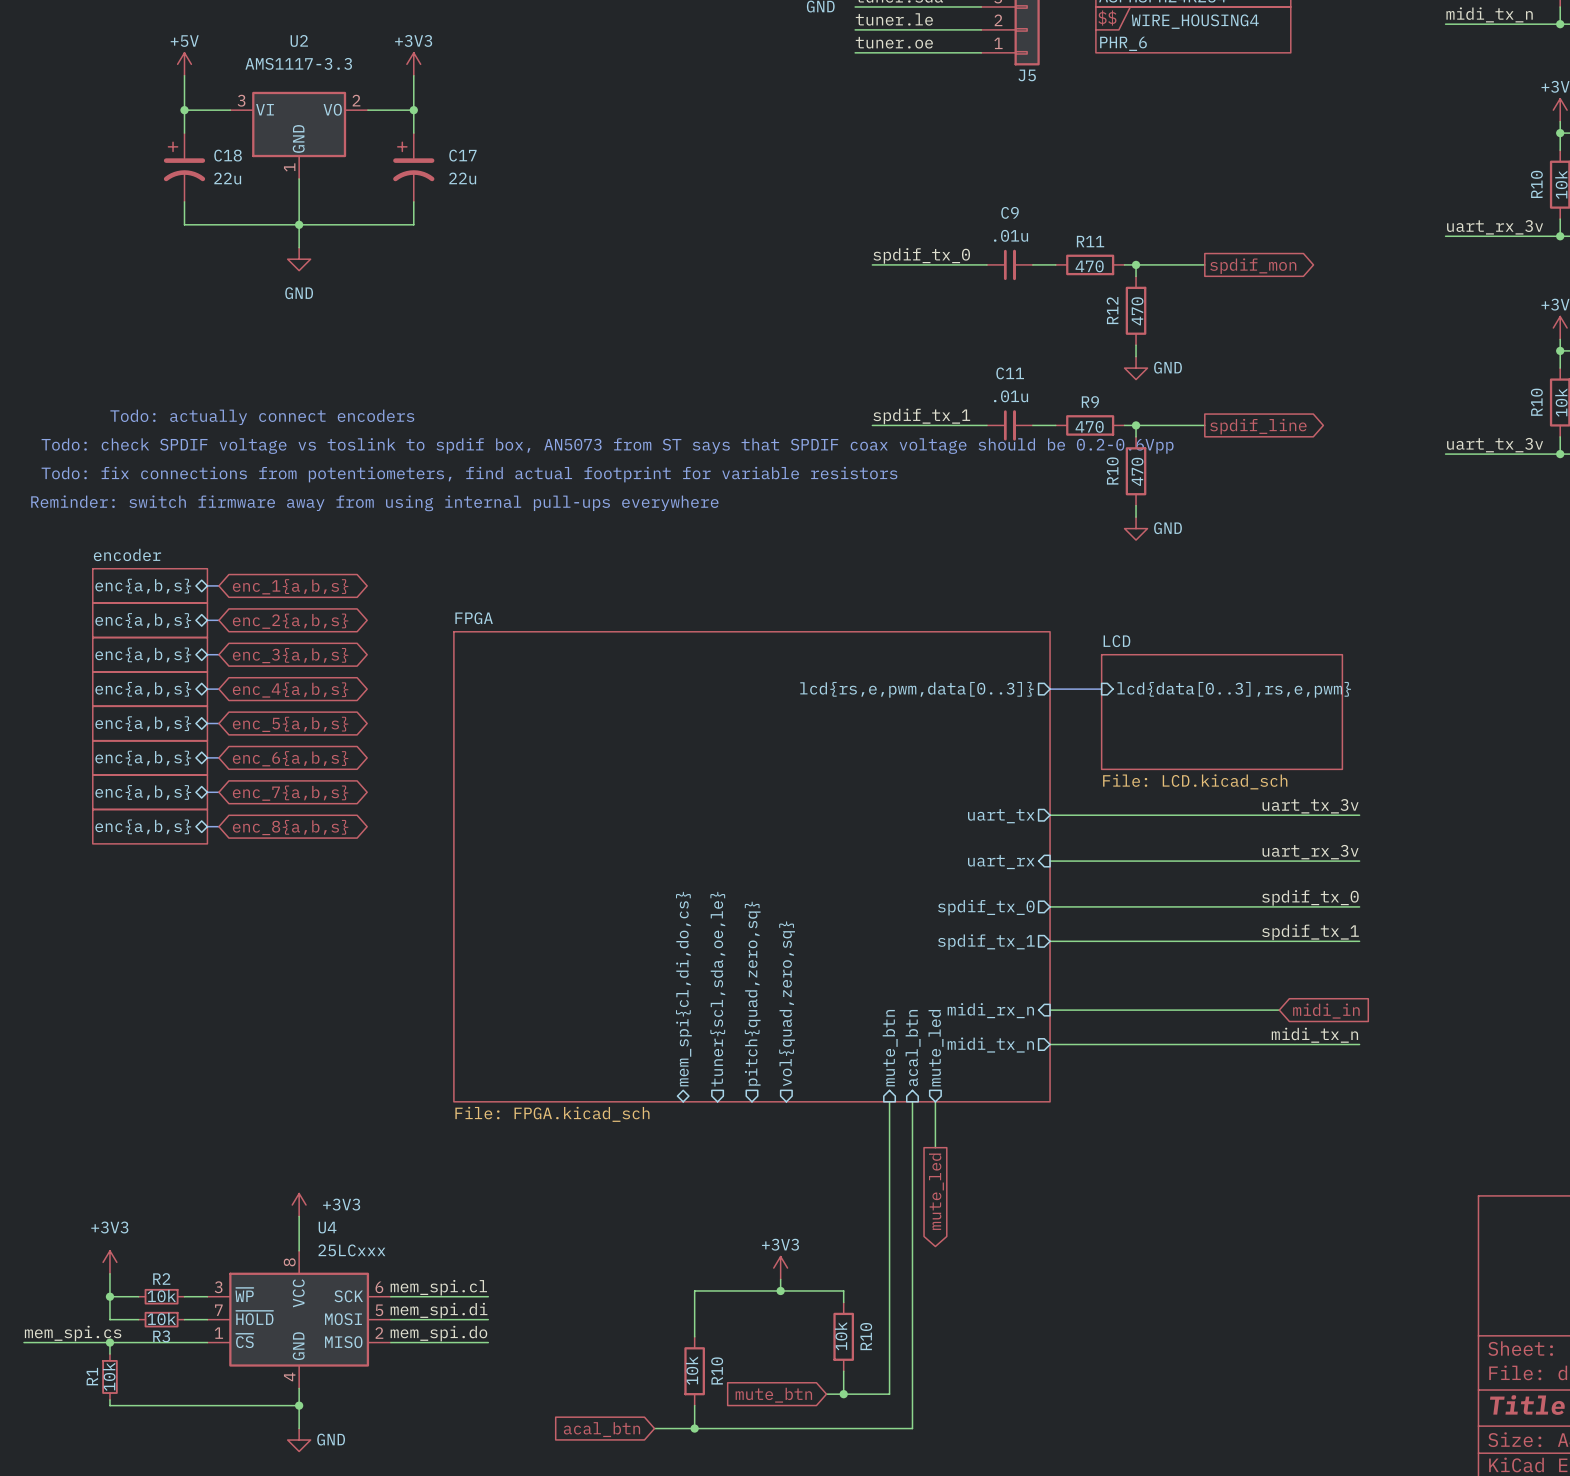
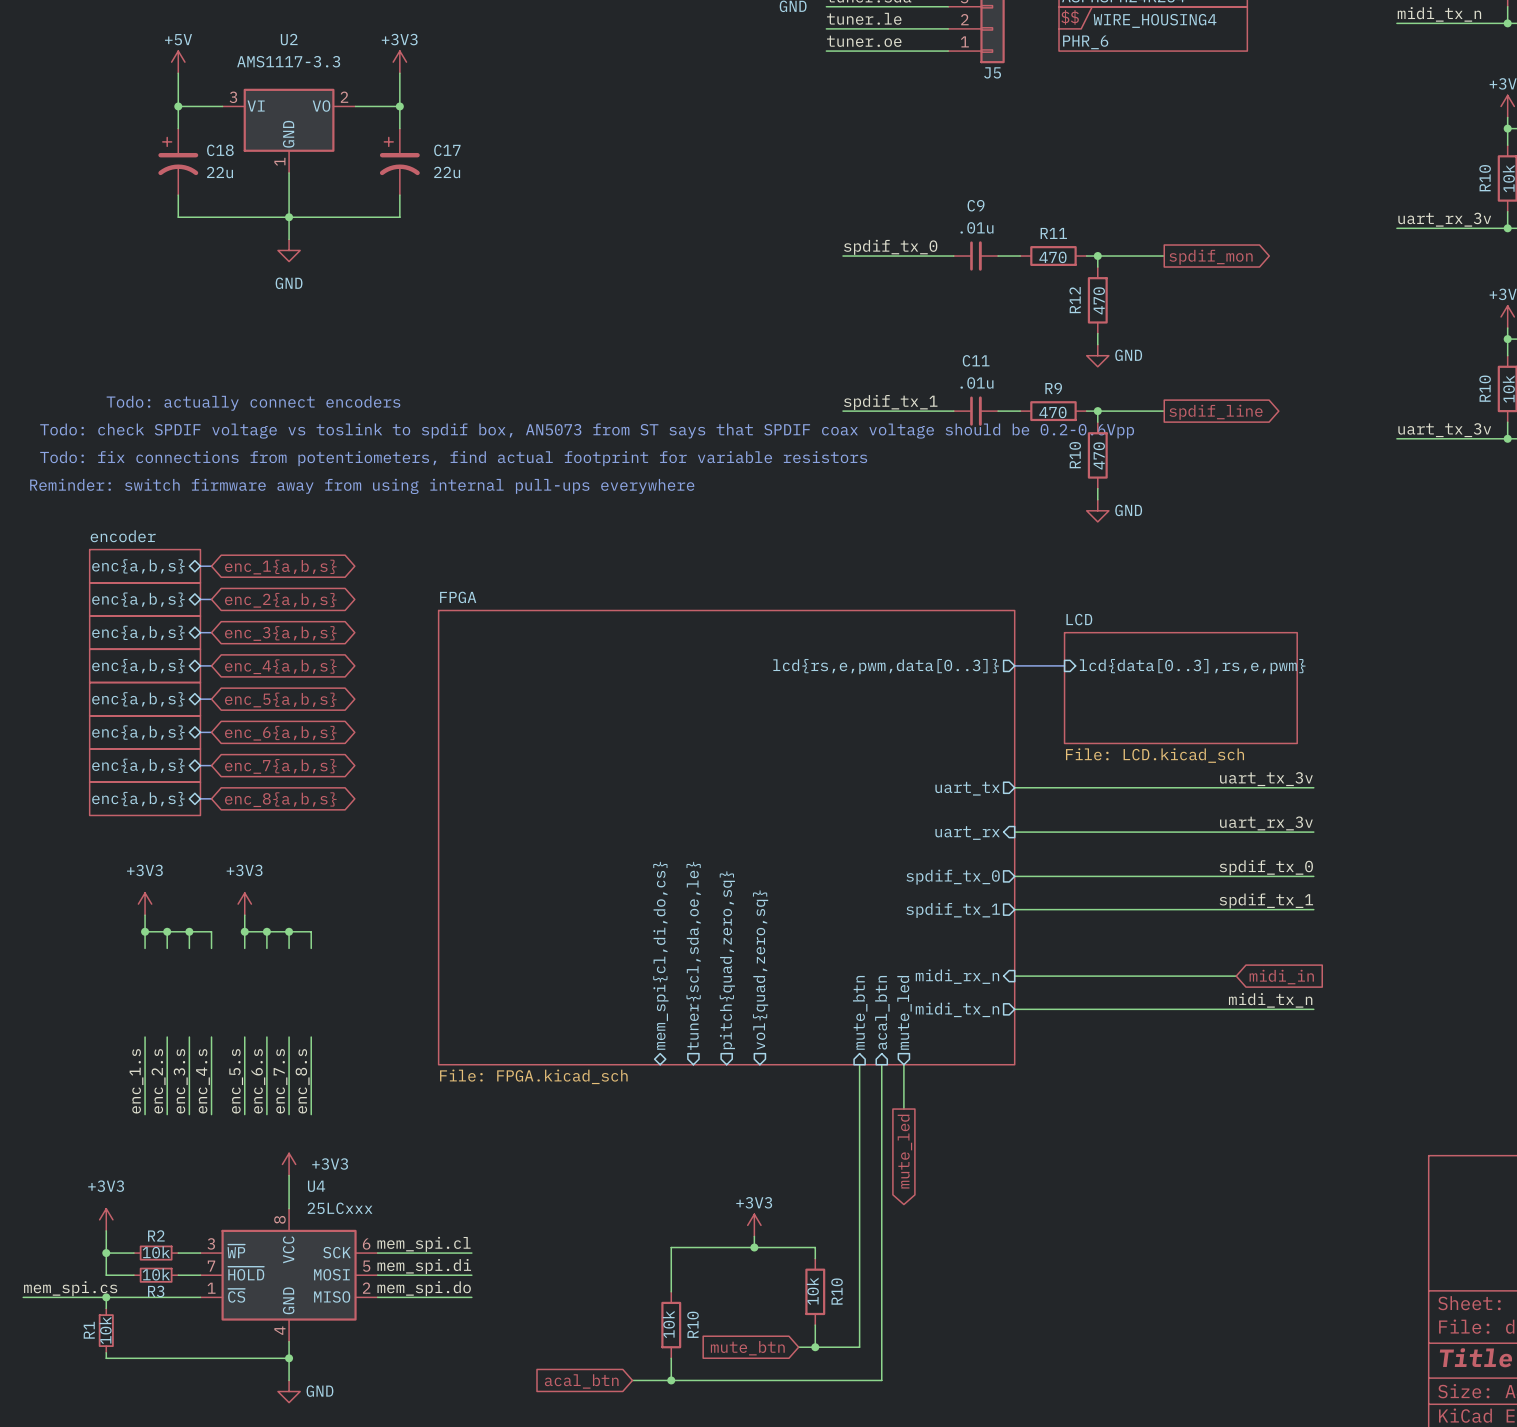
power symbol: none -> +3V3 (145, 904)
power symbol: none -> +3V3 (244, 904)
wire: none -> (145, 915) (145, 948)
wire: none -> (244, 915) (244, 948)
wire: none -> (145, 931) (211, 931) (211, 948)
junction: none -> (145, 931)
wire: none -> (167, 931) (167, 948)
junction: none -> (167, 931)
wire: none -> (189, 931) (189, 948)
junction: none -> (189, 931)
wire: none -> (244, 931) (311, 931) (311, 948)
junction: none -> (244, 931)
wire: none -> (266, 931) (266, 948)
junction: none -> (266, 931)
wire: none -> (289, 931) (289, 948)
junction: none -> (289, 931)
wire: none -> (145, 1037) (145, 1114)
wire: none -> (167, 1037) (167, 1114)
wire: none -> (189, 1037) (189, 1114)
wire: none -> (211, 1037) (211, 1114)
wire: none -> (244, 1037) (244, 1114)
wire: none -> (266, 1037) (266, 1114)
wire: none -> (289, 1037) (289, 1114)
wire: none -> (311, 1037) (311, 1114)
label: none -> enc_1.s (136, 1081)
label: none -> enc_2.s (158, 1081)
label: none -> enc_3.s (180, 1081)
label: none -> enc_4.s (202, 1081)
label: none -> enc_5.s (236, 1081)
label: none -> enc_6.s (258, 1081)
label: none -> enc_7.s (280, 1081)
label: none -> enc_8.s (302, 1081)

